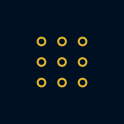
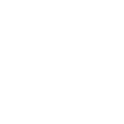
part: (62, 62) -> none

